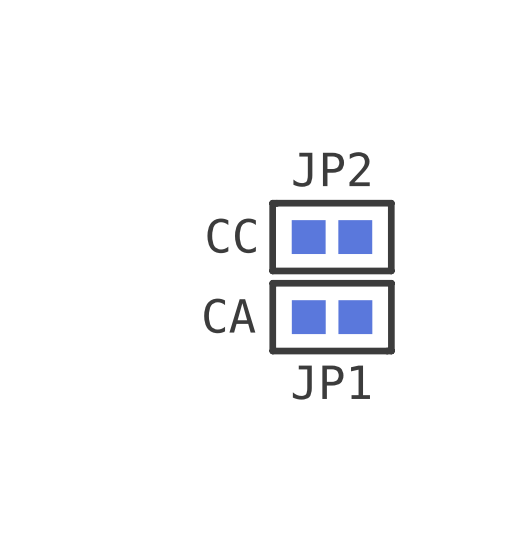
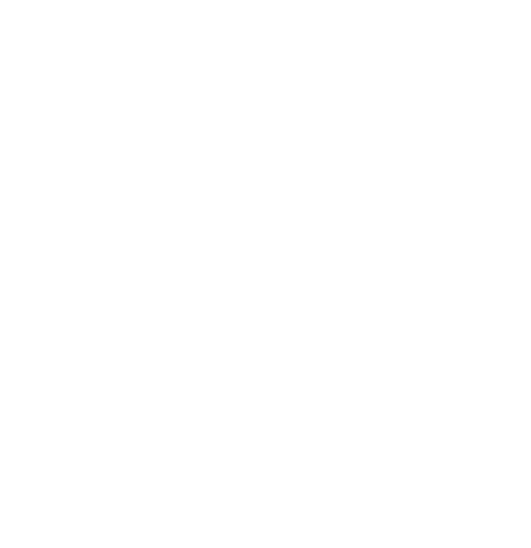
JP2: CC (331, 237) -> none
JP1: CA (332, 317) -> none

